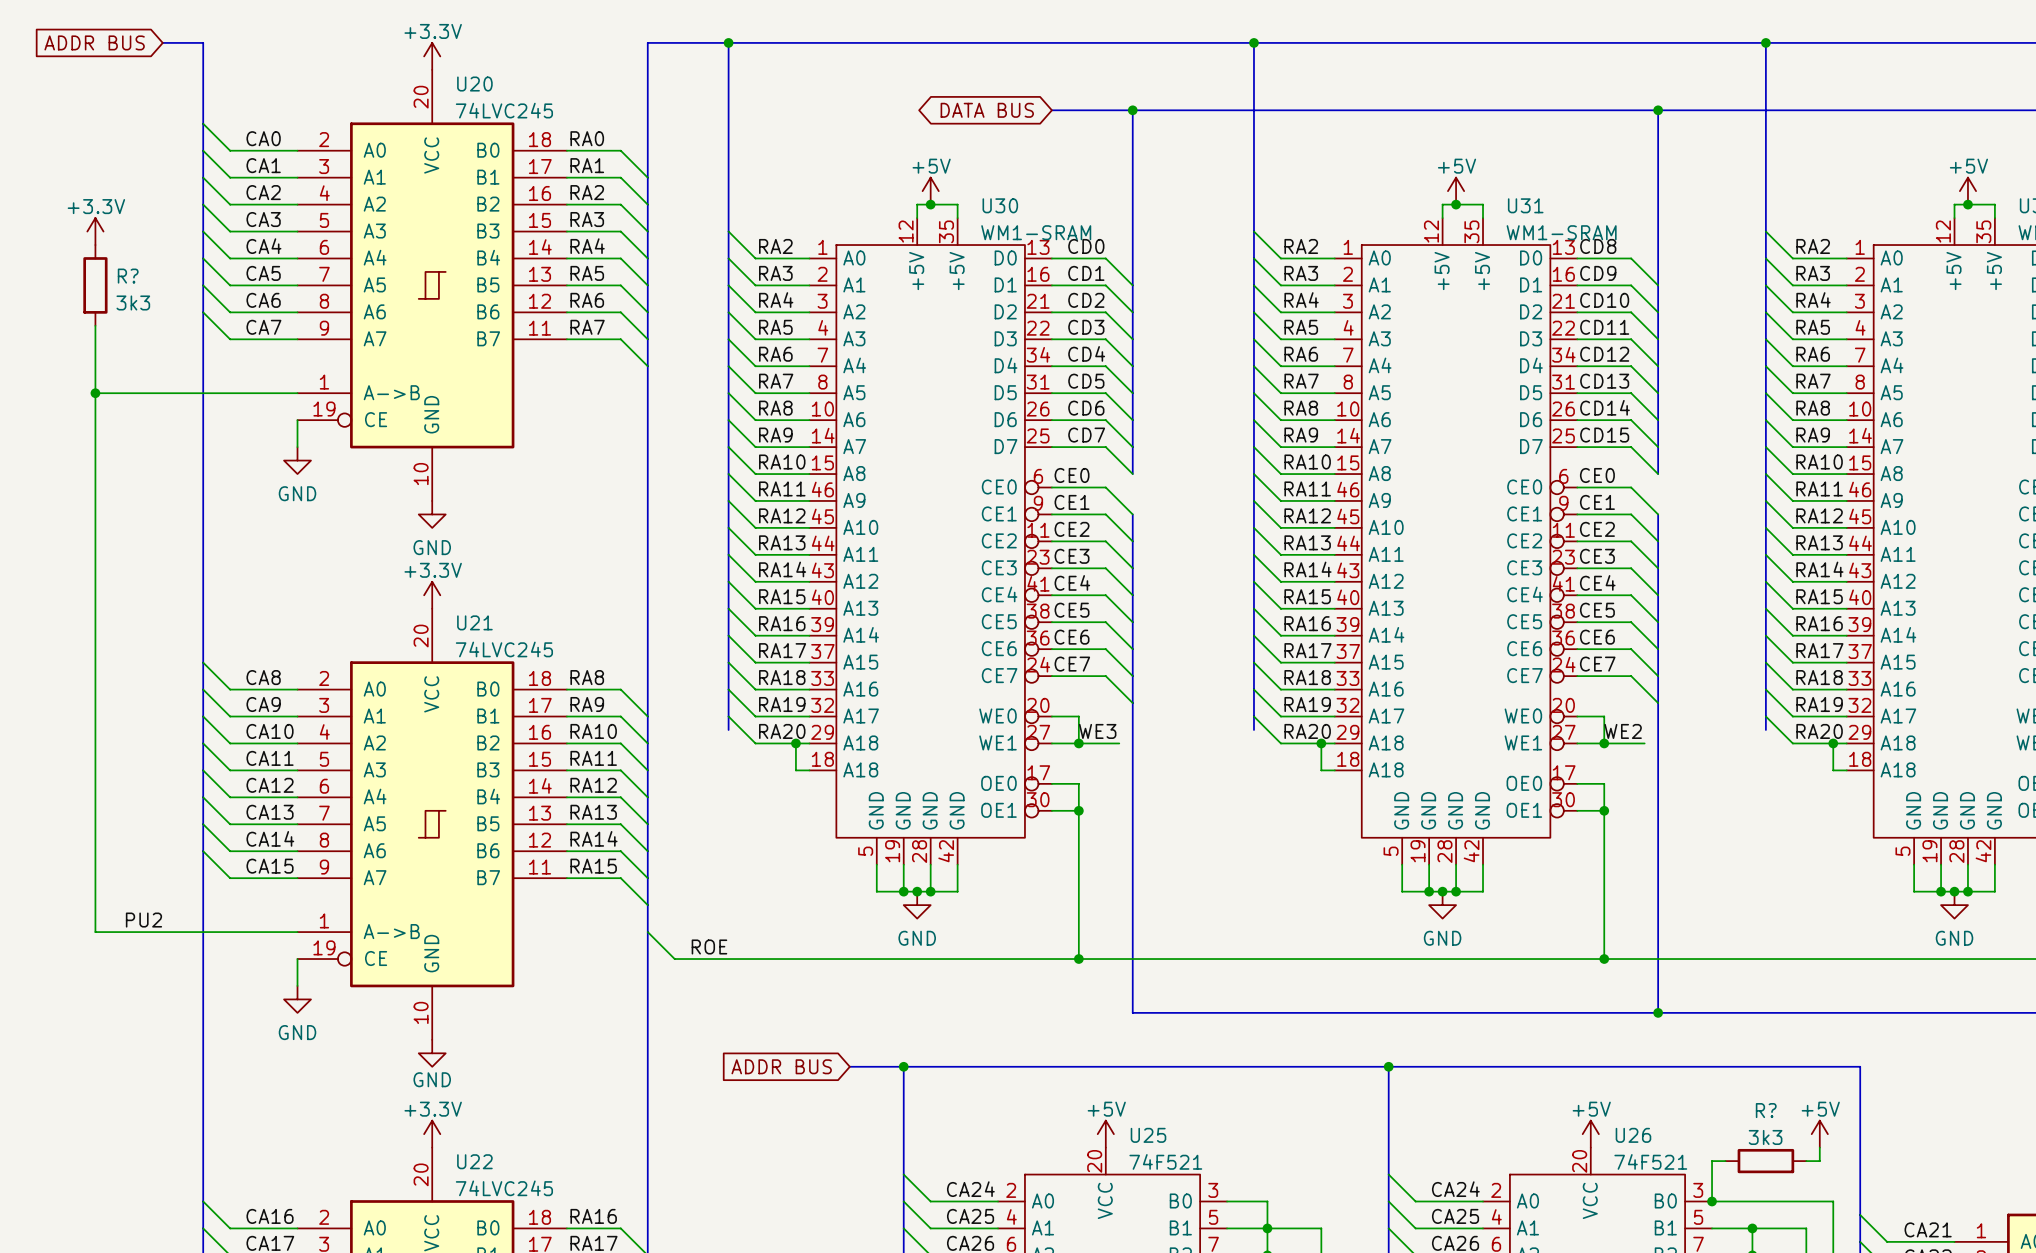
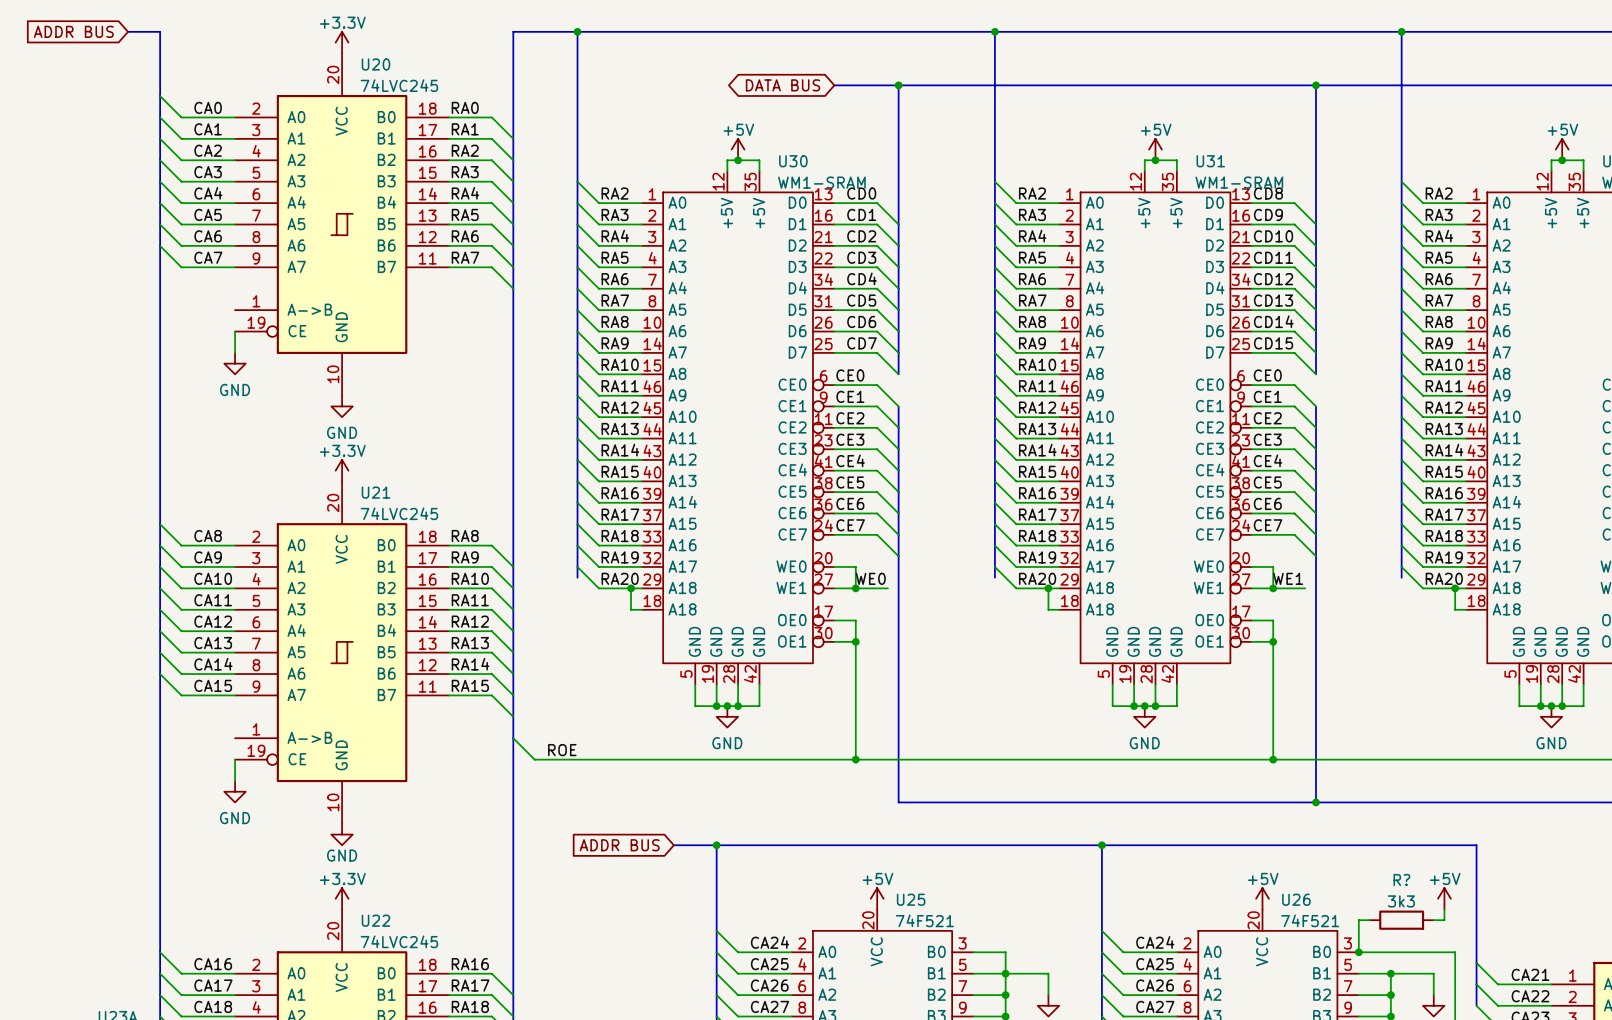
power symbol: +3.3V (95, 231) -> none
R?: 3k3 (95, 285) -> none
wire: (95, 325) (95, 932) (297, 932) -> none
wire: (95, 393) (297, 393) -> none
junction: (95, 393) -> none
label: WE3 (1097, 731) -> WE0 (870, 578)
label: WE2 (1623, 731) -> WE1 (1288, 578)
label: PU2 (143, 920) -> none

